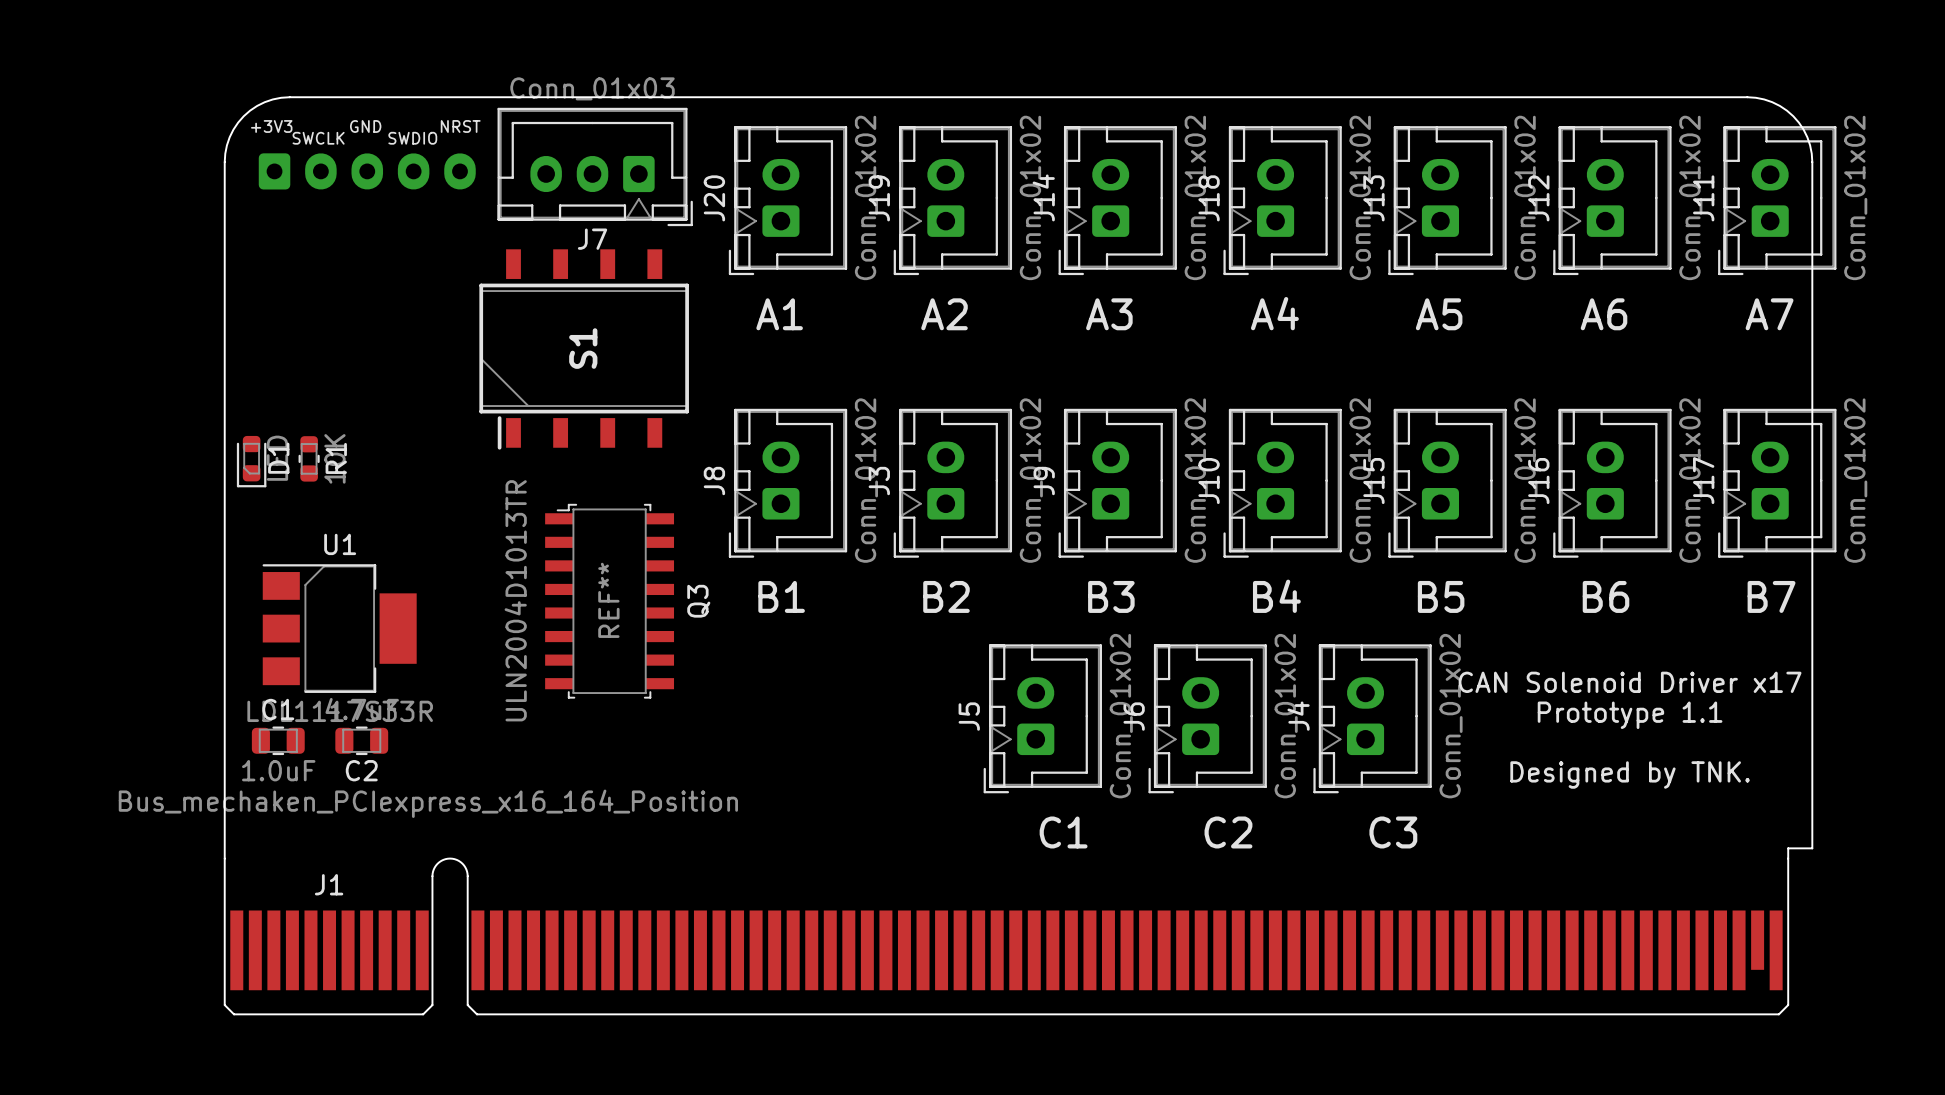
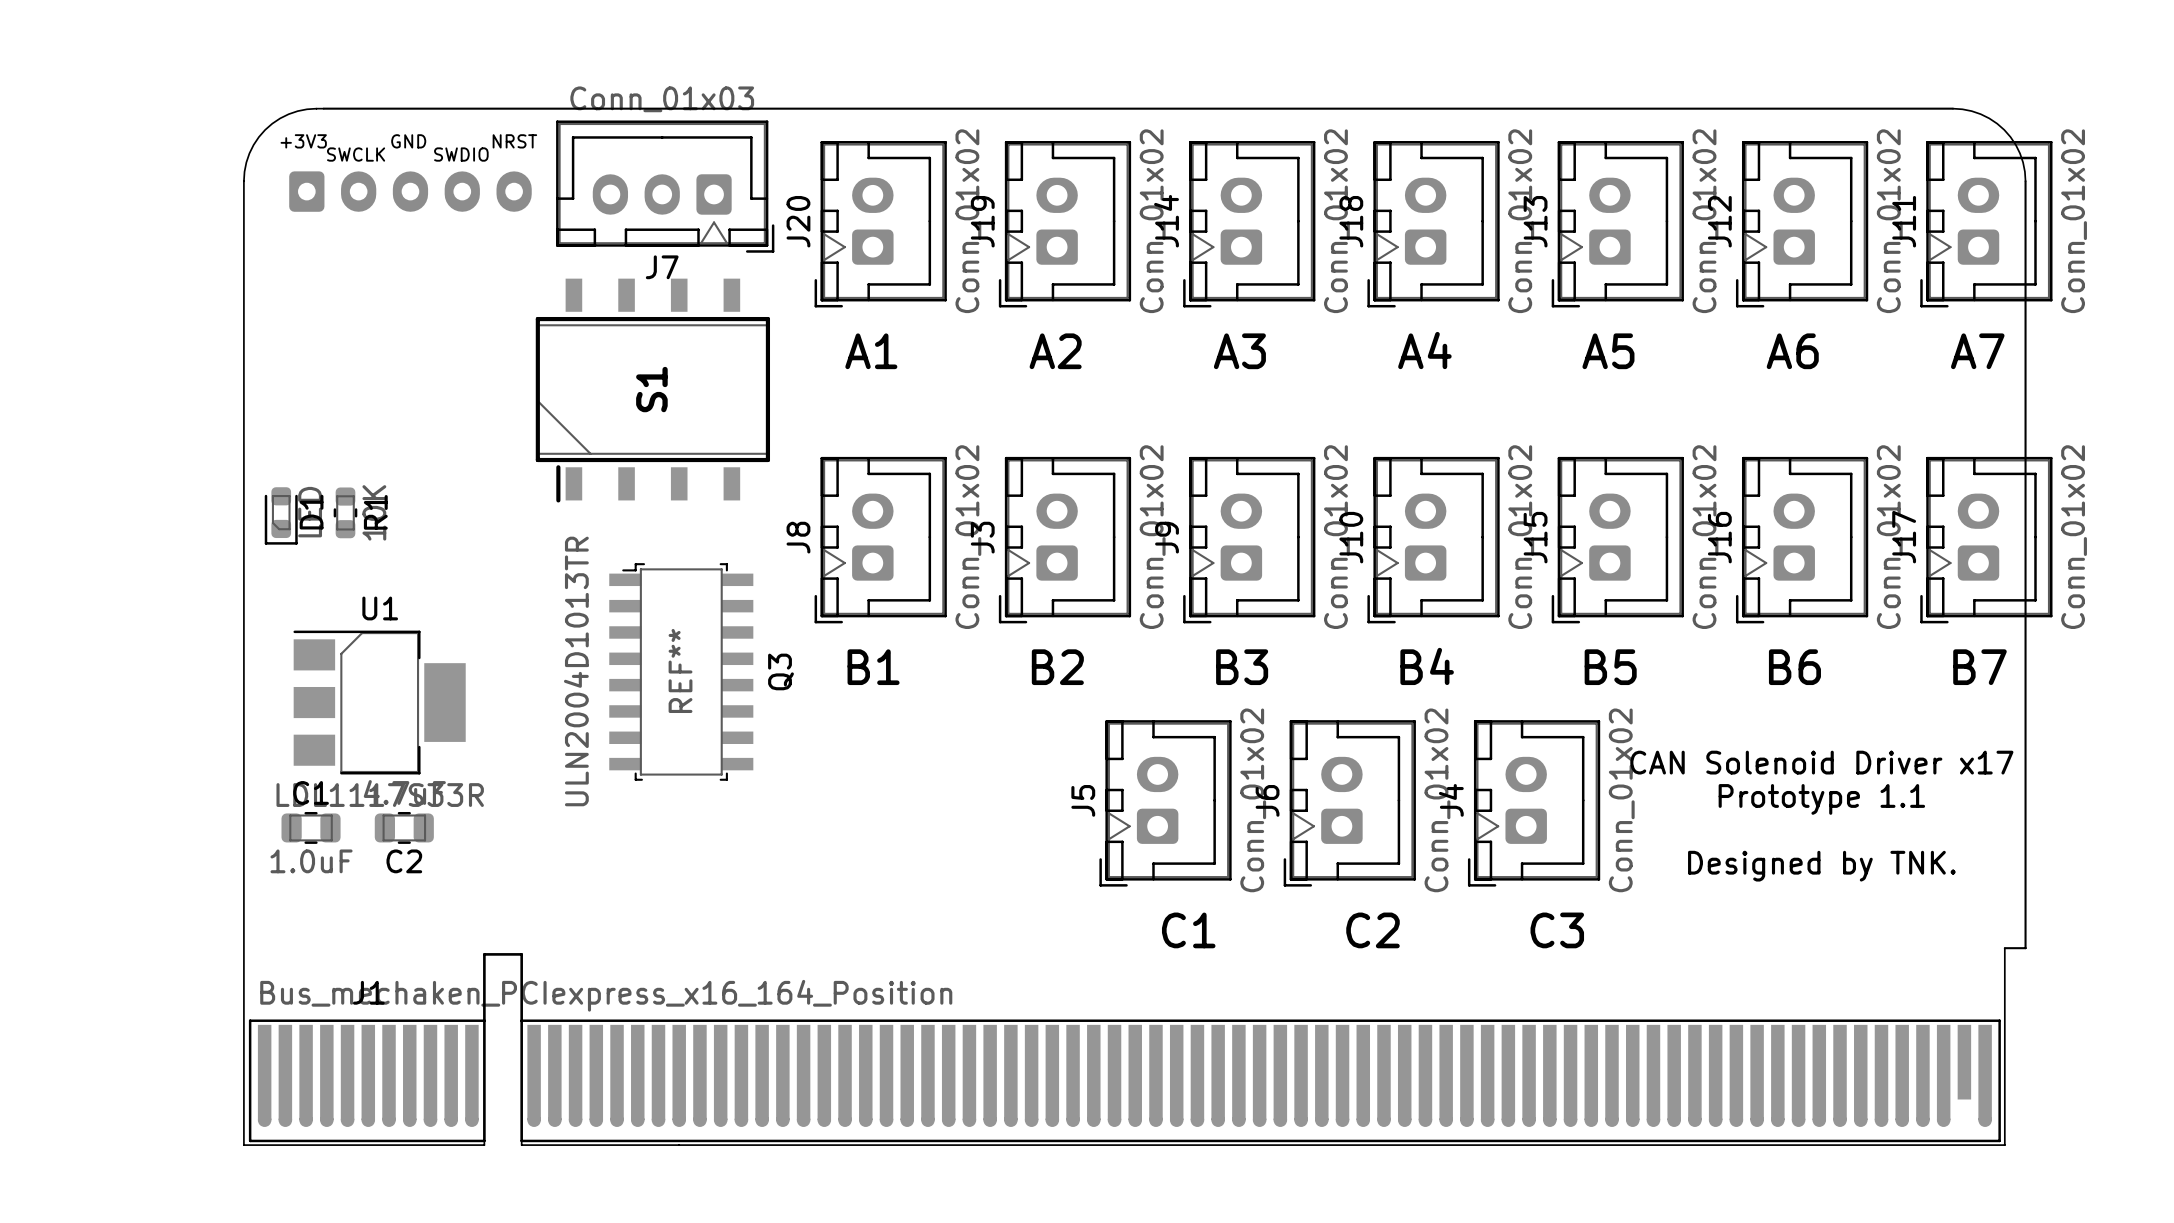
board edge: (289, 97) (272, 99) (250, 110) (233, 129) (225, 153) (224, 858) -> (323, 108) (297, 111) (272, 123) (253, 144) (244, 171) (243, 1145) (484, 1145) (484, 954) (521, 954) (521, 1145) (2004, 1145) (2004, 948)
J1 value position: Bus_mechaken_PCIexpress_x16_164_Position (428, 803) -> Bus_mechaken_PCIexpress_x16_164_Position (606, 995)
board edge: (1793, 848) (1788, 848) (1788, 858) -> none
J1 footprint: [223, 857, 1790, 1016] -> [248, 953, 2001, 1143]

